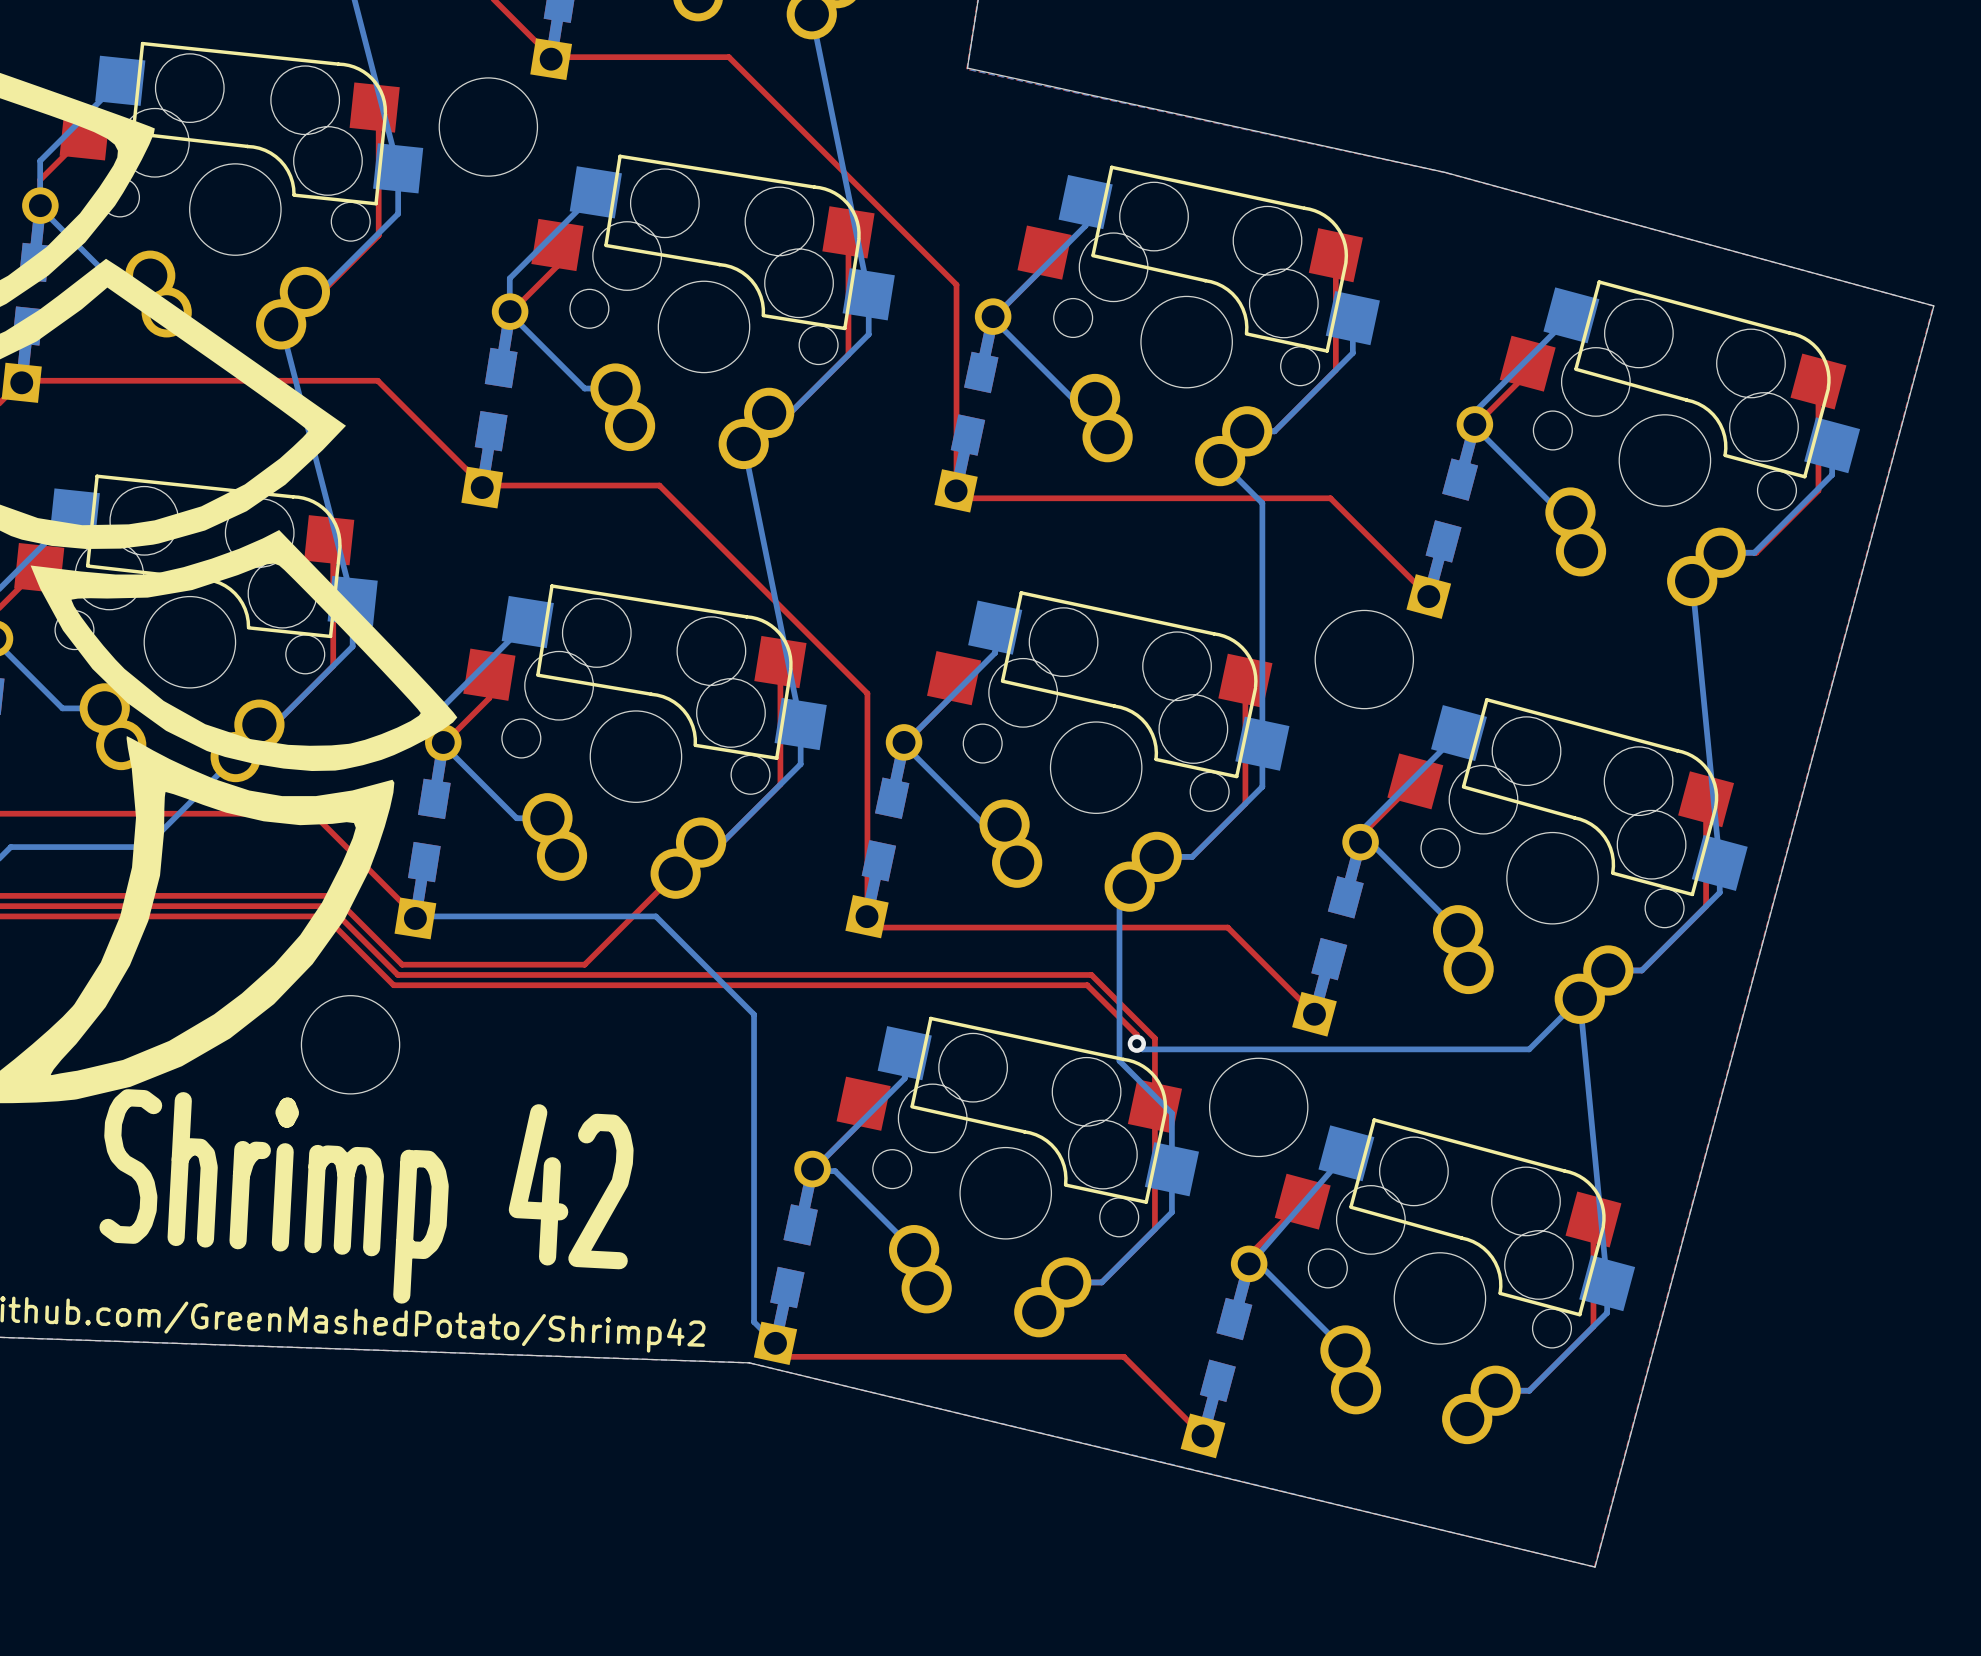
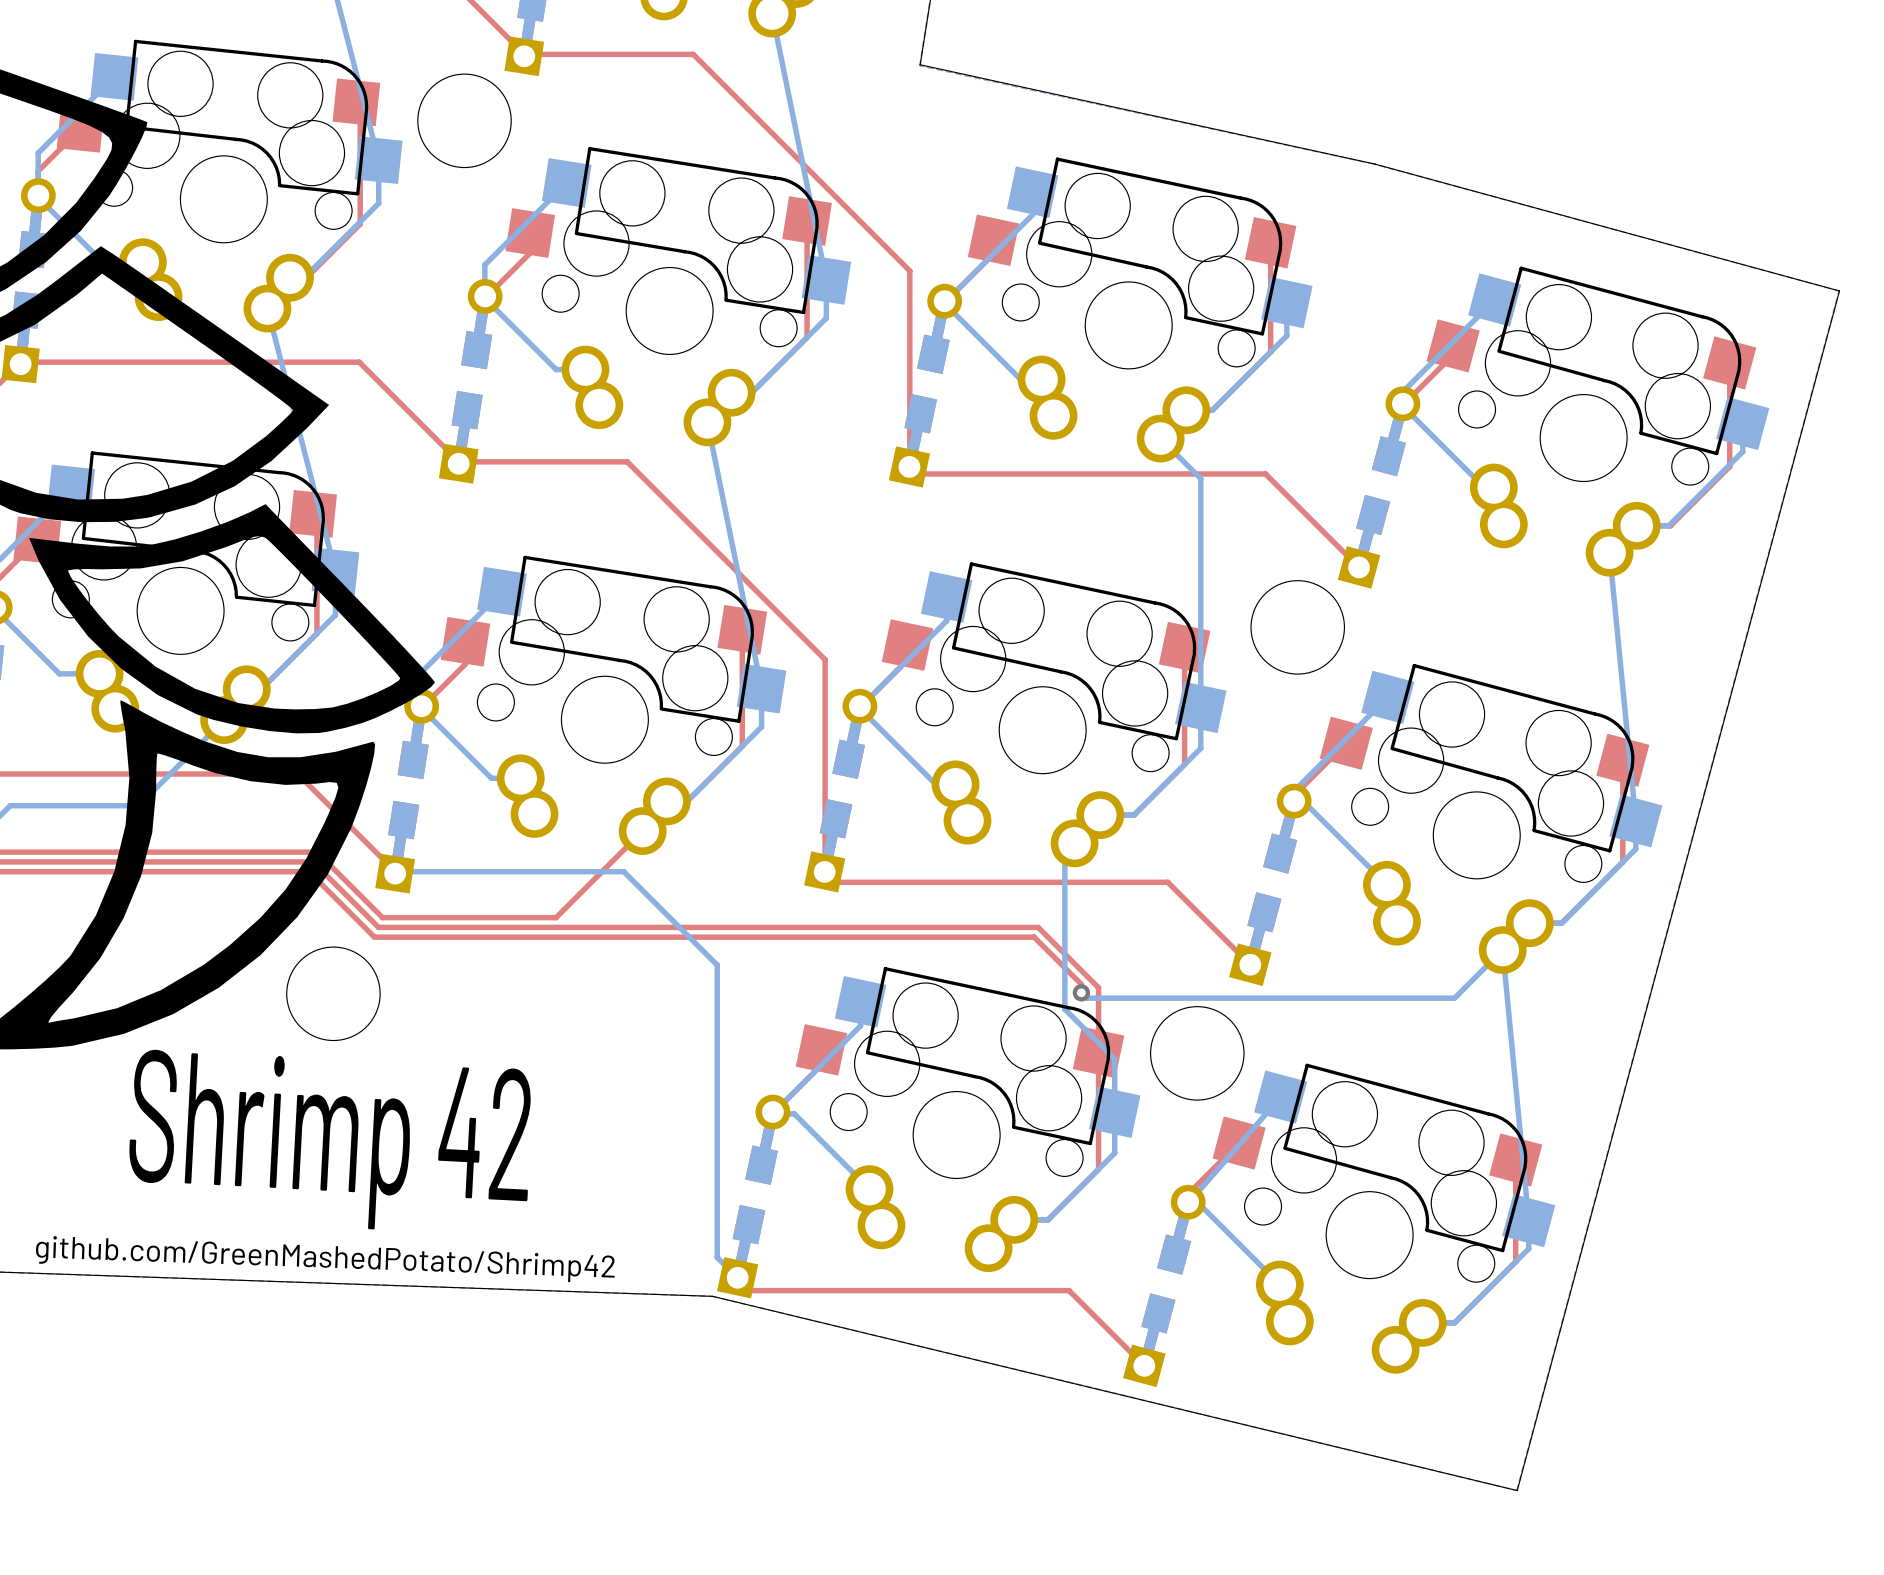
text position: Shrimp 42 (366, 1196) -> Shrimp 42 (329, 1139)

